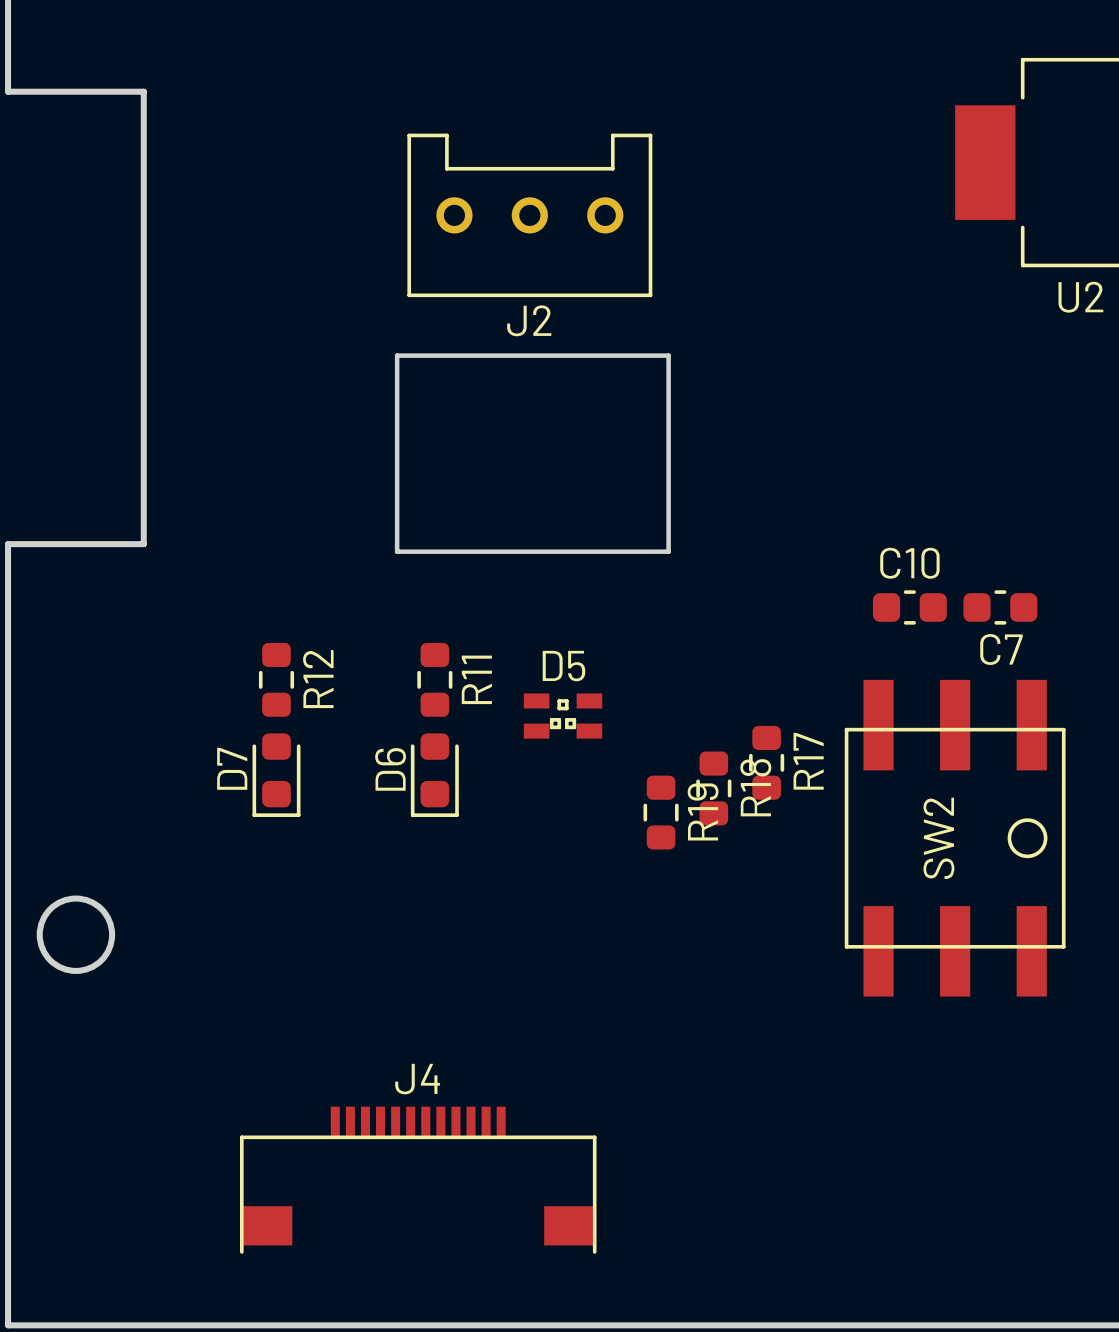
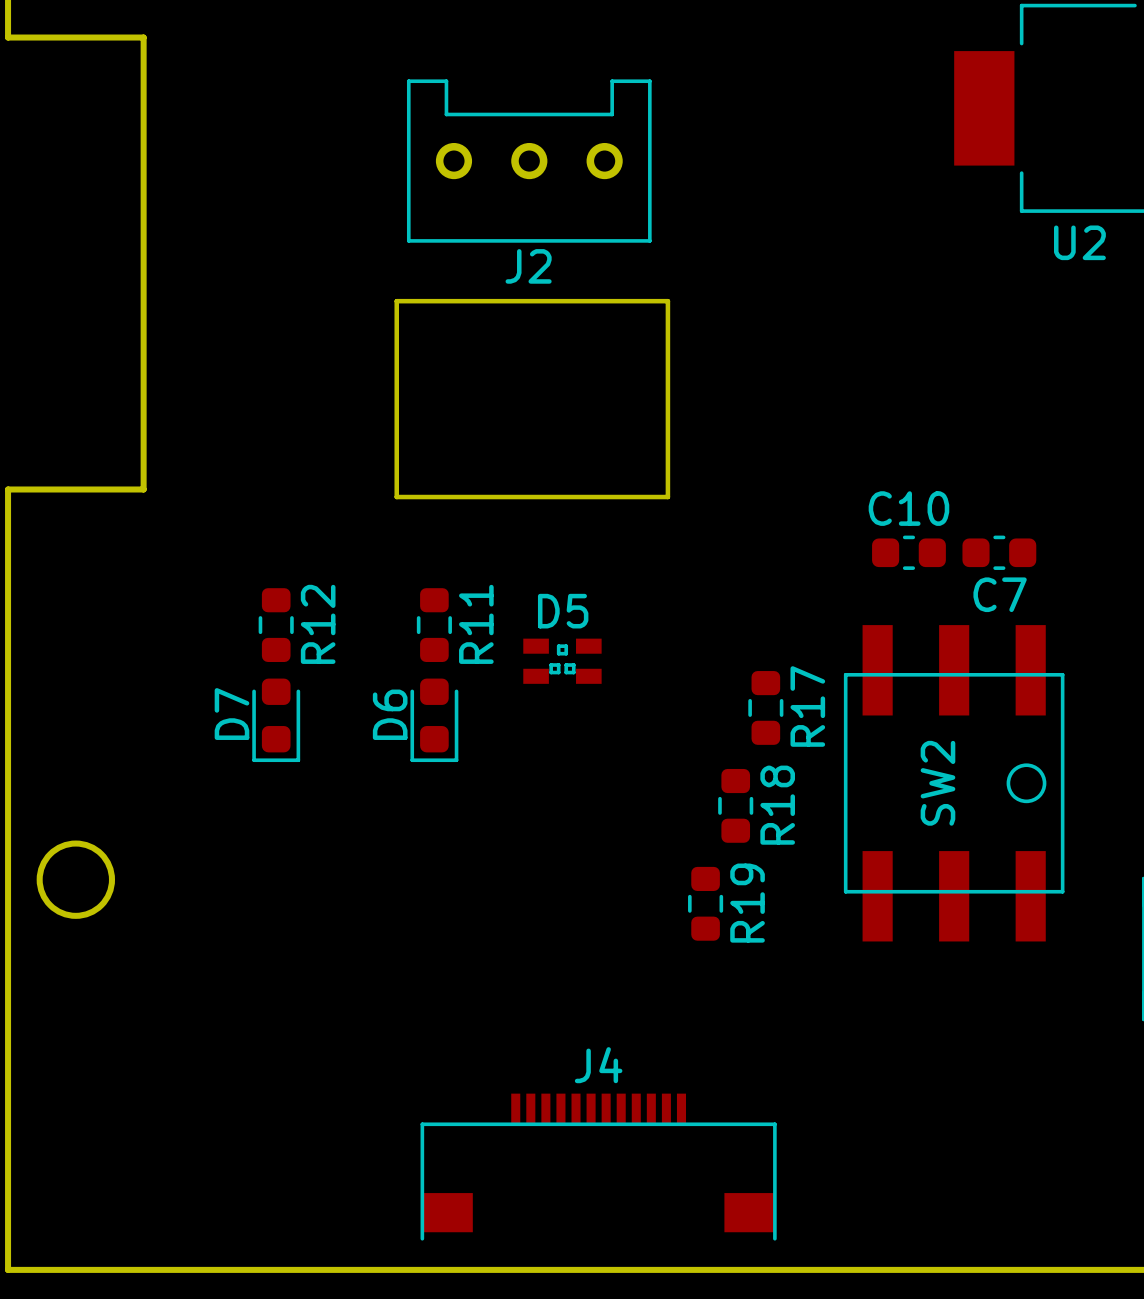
R18 position: (713, 788) -> (735, 805)
R19 position: (661, 812) -> (705, 903)
J4 position: (418, 1180) -> (598, 1167)

